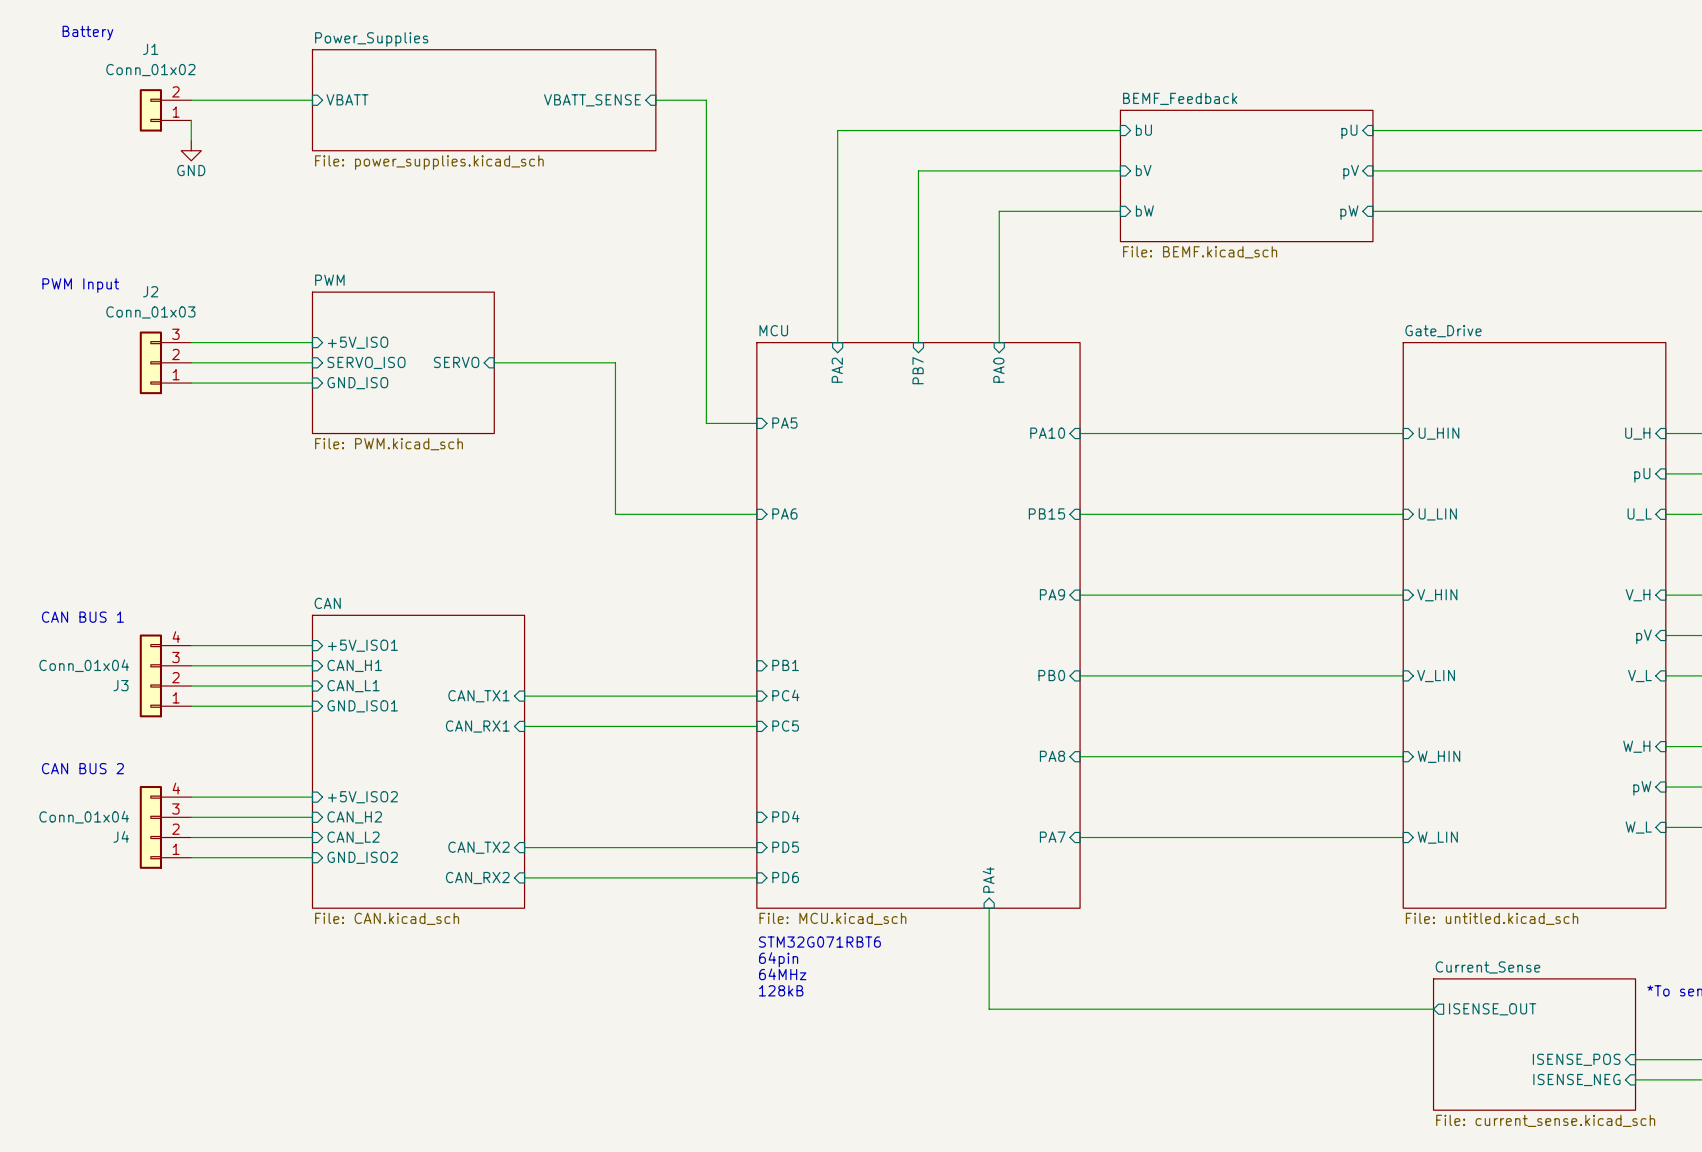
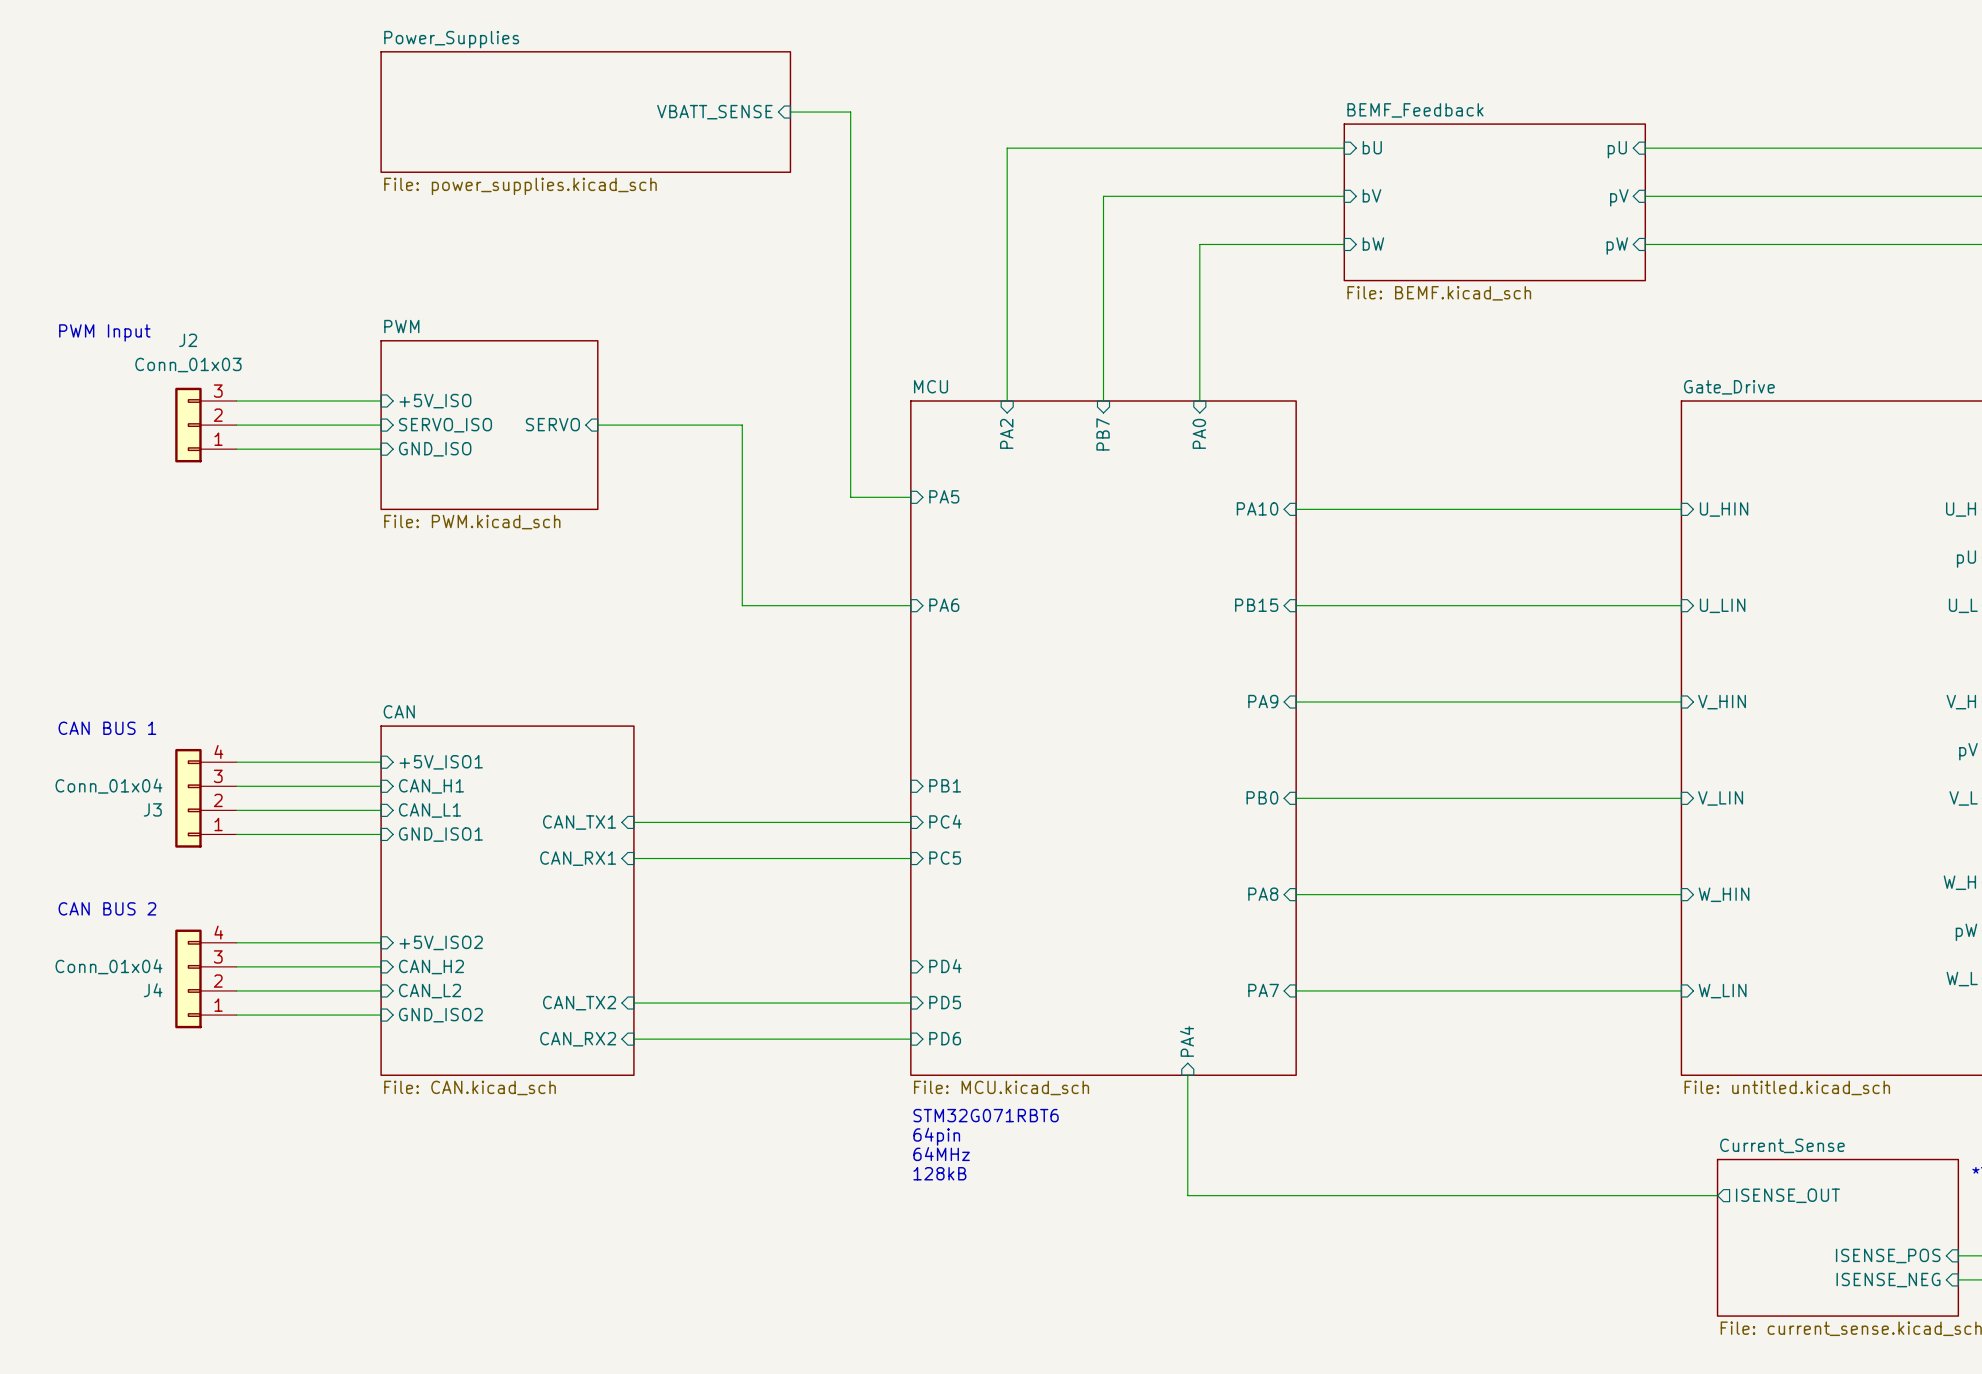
text: Battery (87, 33) -> none
sheet pin: VBATT (347, 99) -> none
wire: (191, 100) (312, 100) -> none
J1: Conn_01x02 (165, 110) -> none
wire: (191, 120) (191, 140) -> none
power symbol: GND (191, 150) -> none

